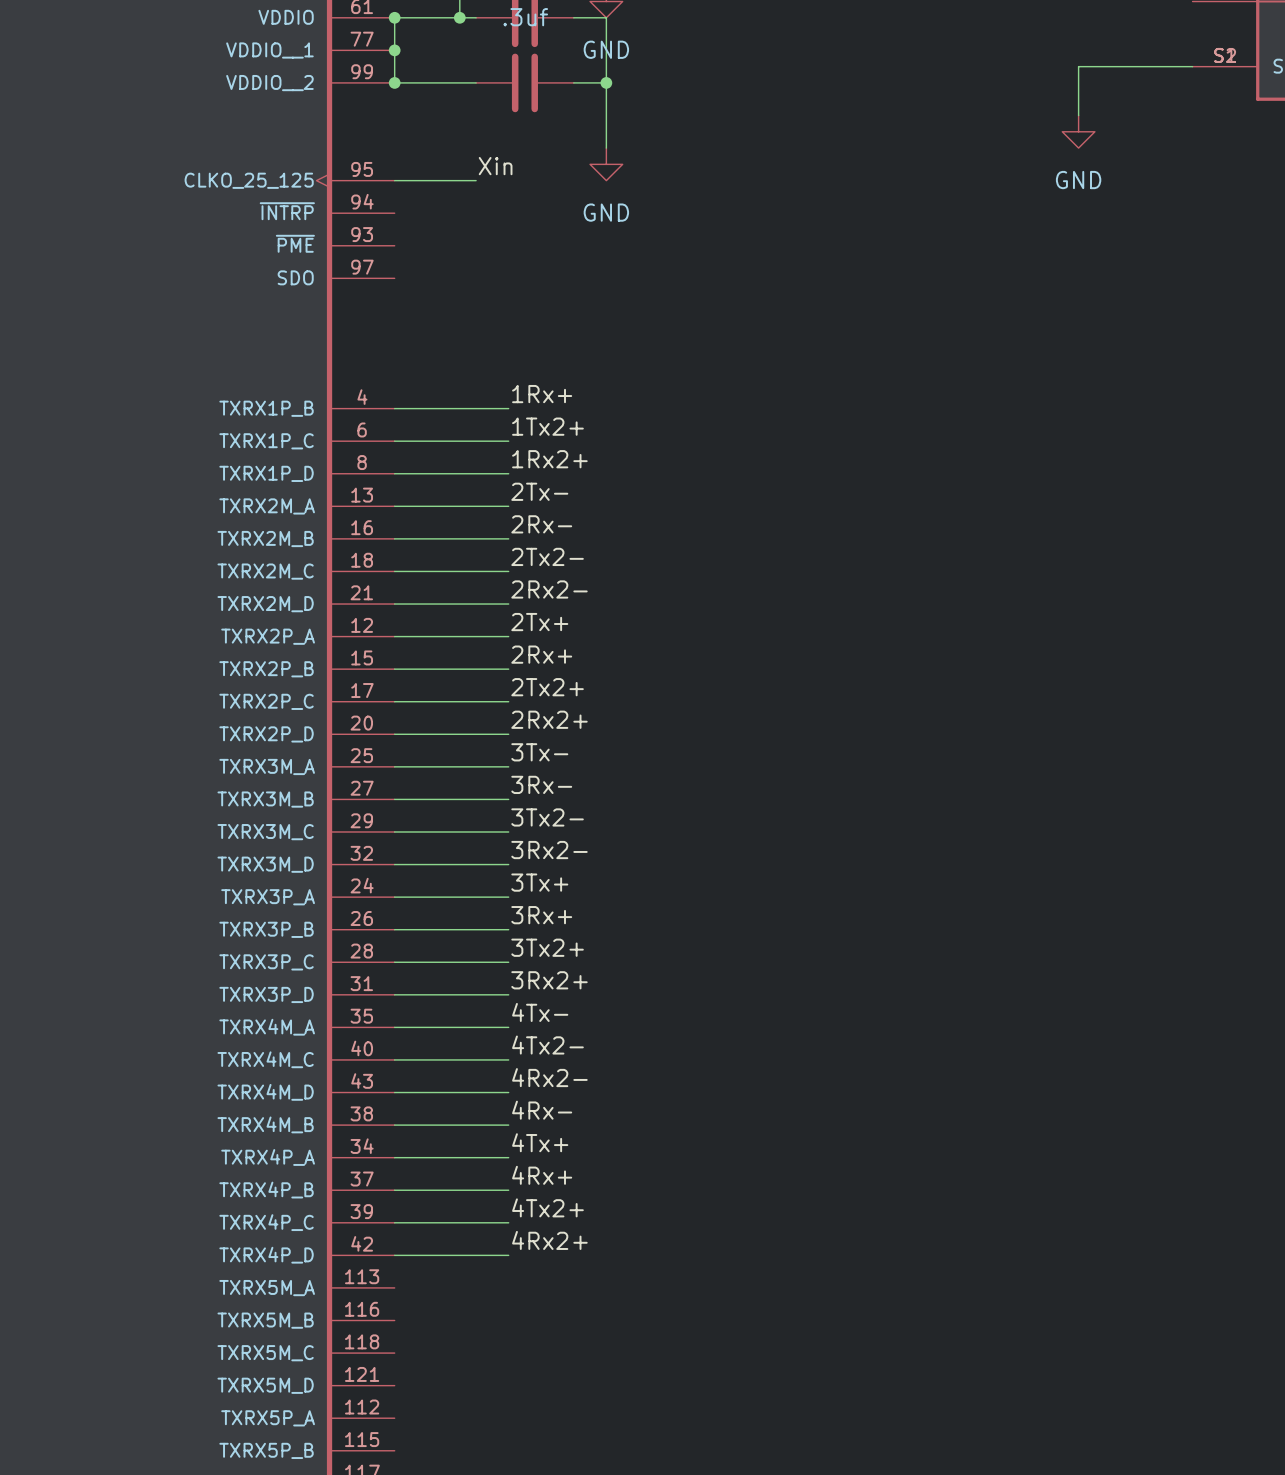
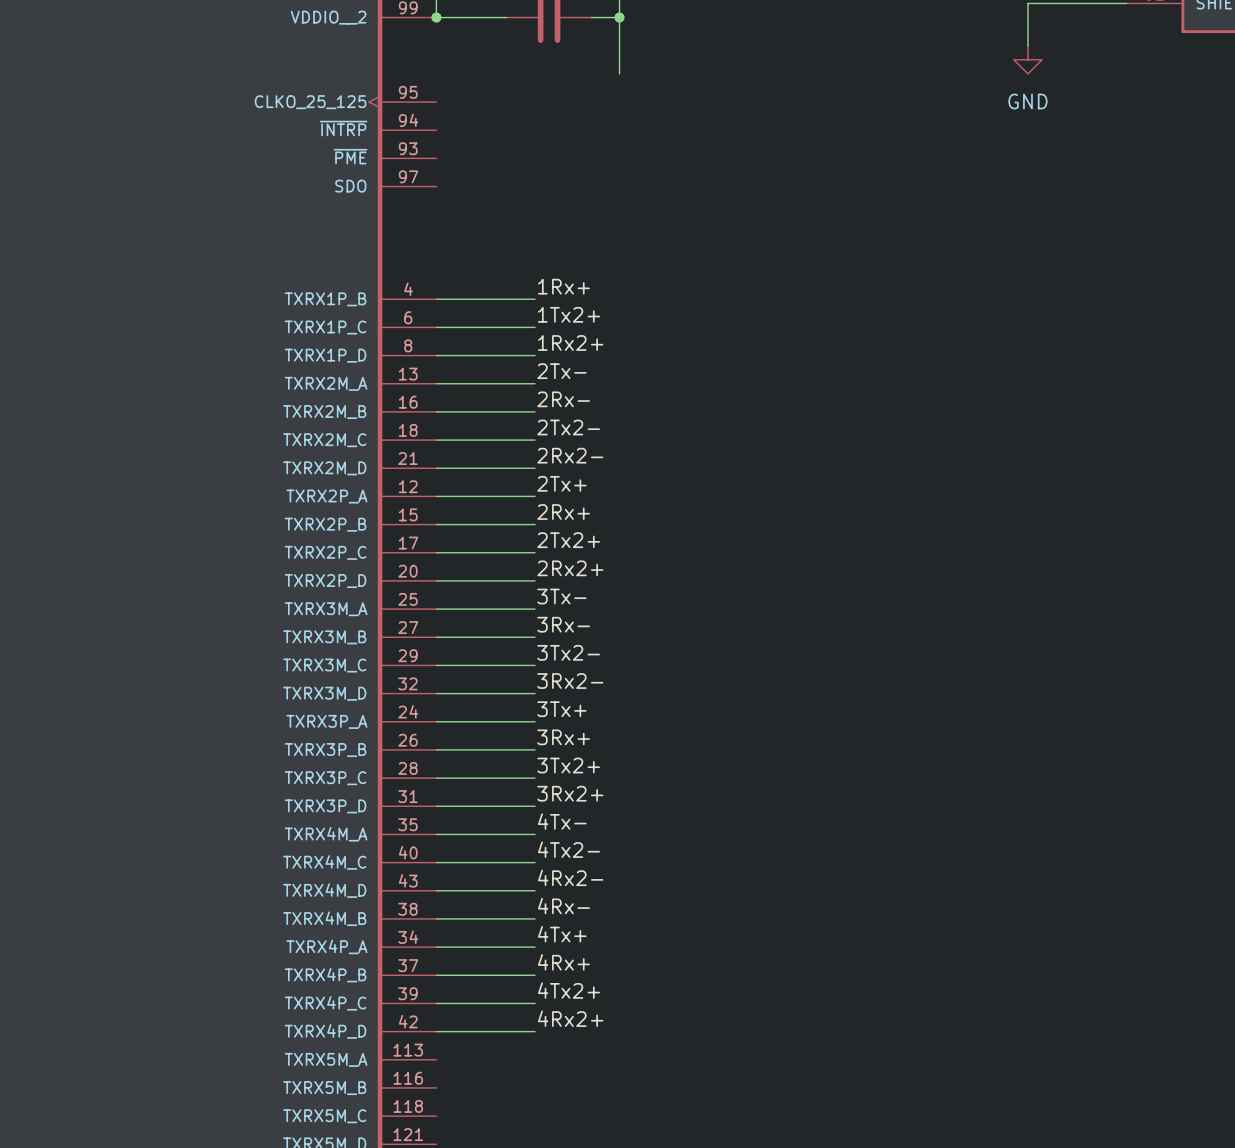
power symbol: GND (606, 164) -> none
label: Xin (495, 166) -> none
wire: (394, 180) (476, 180) -> none

